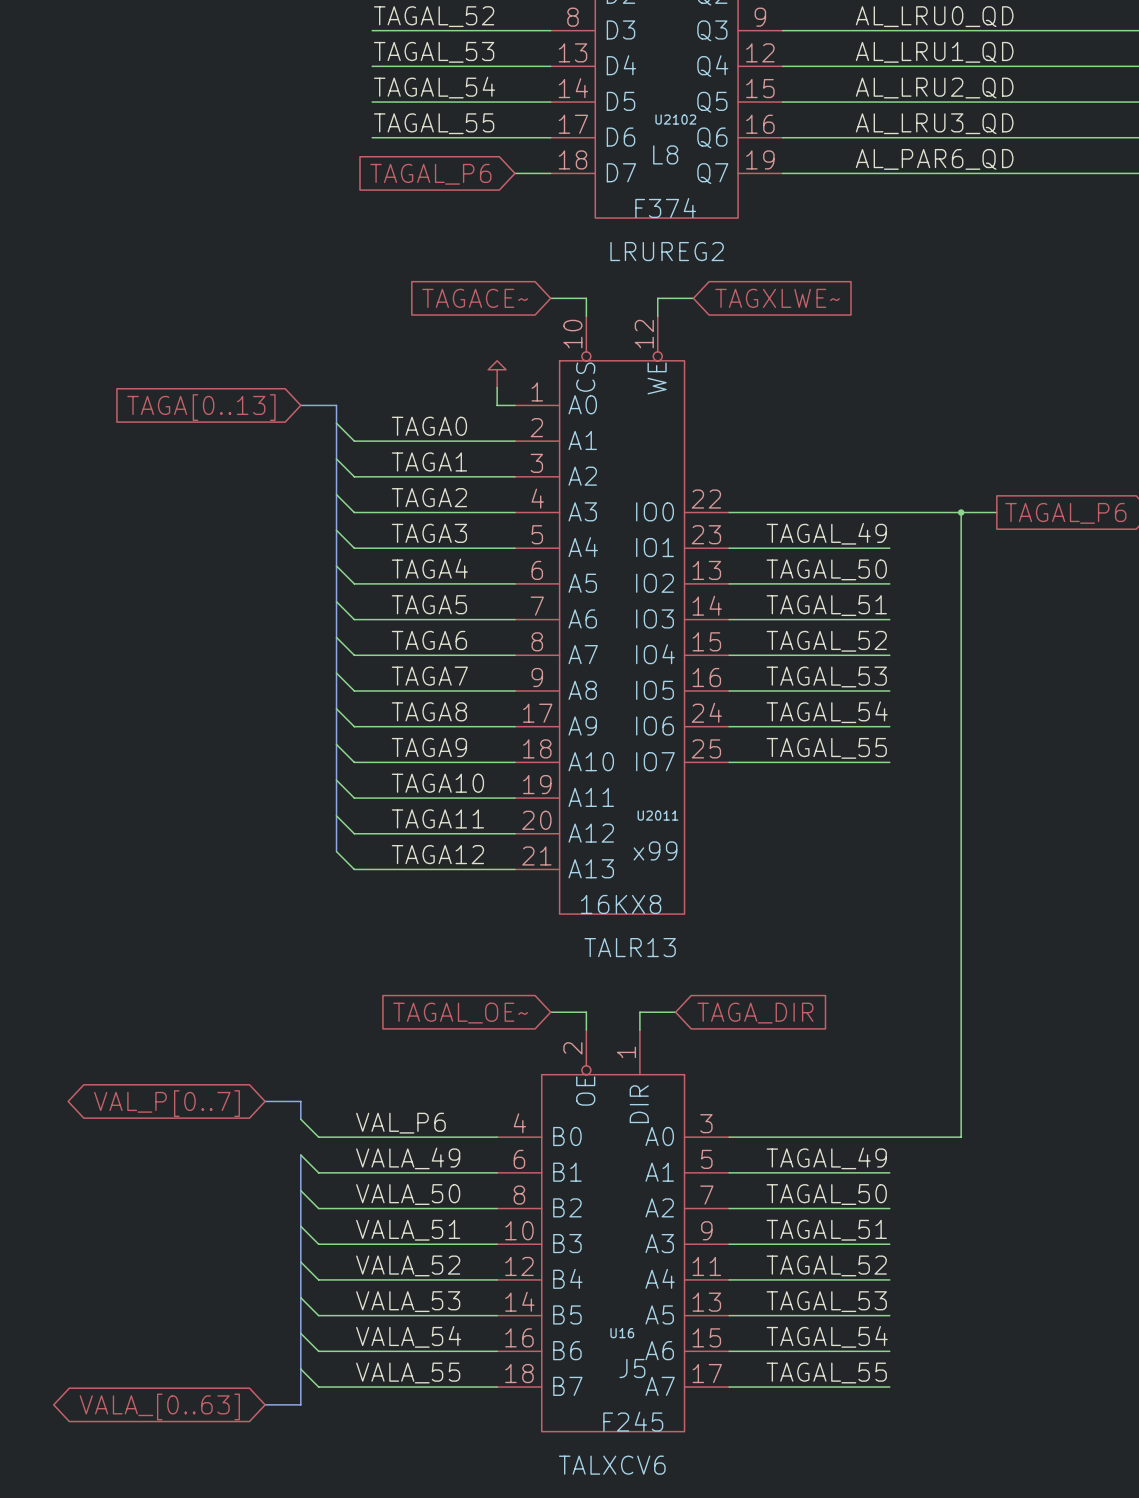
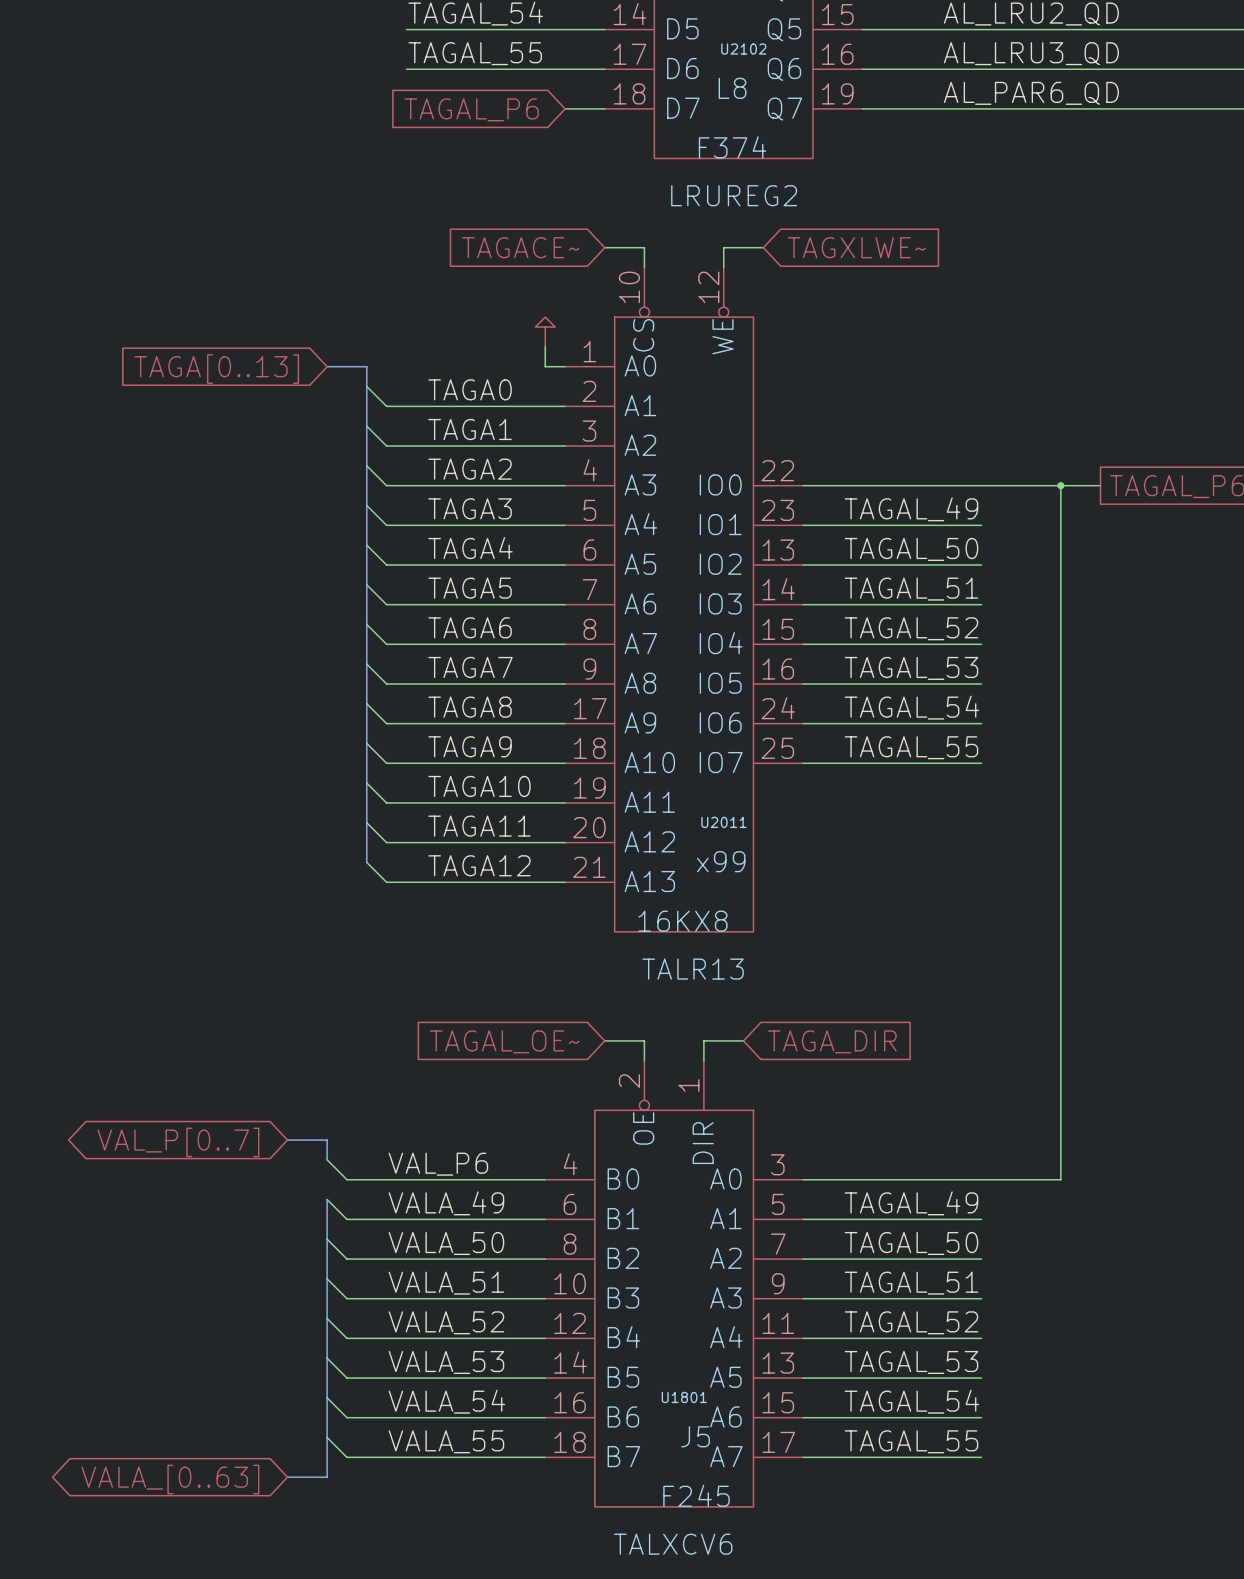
U16 name: U16 (622, 1333) -> U1801 (684, 1397)

